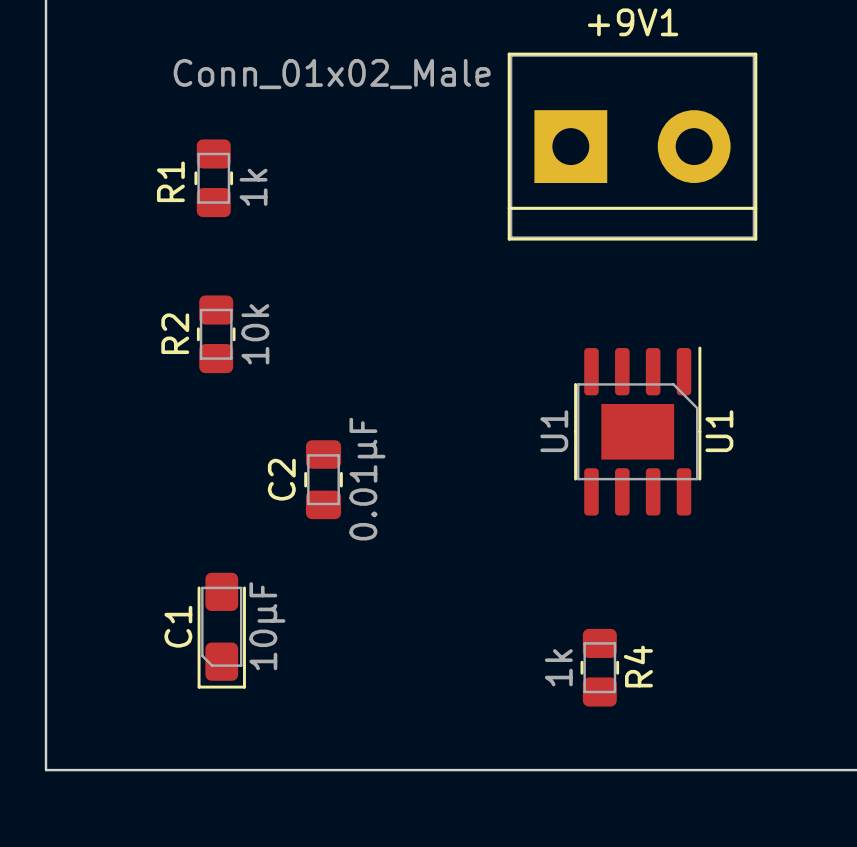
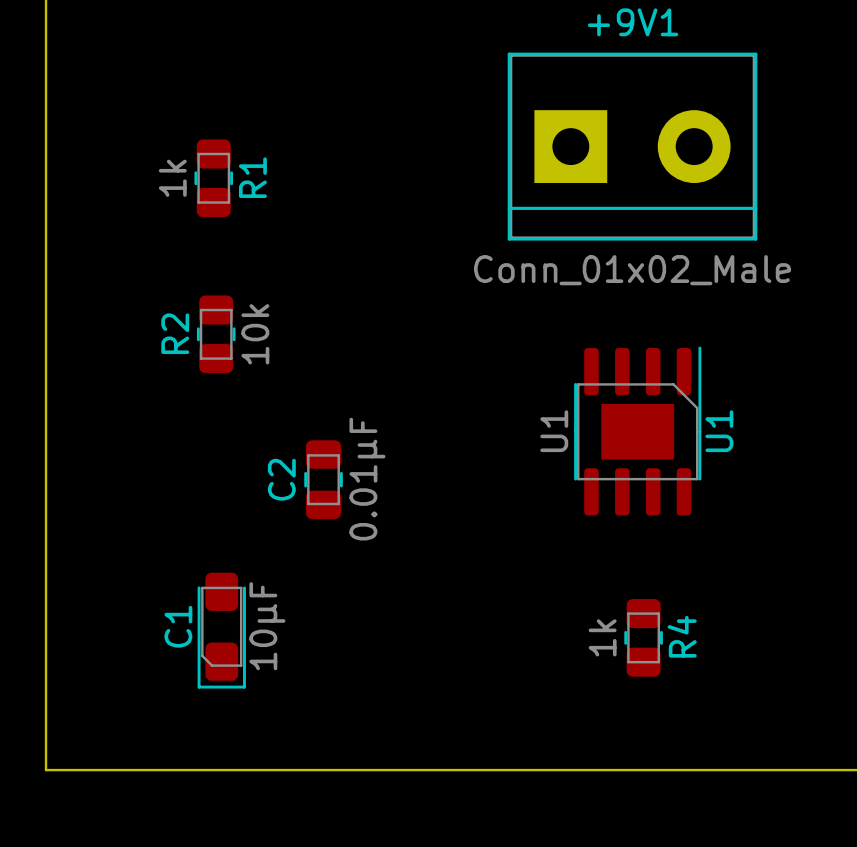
+9V1 value position: Conn_01x02_Male (332, 74) -> Conn_01x02_Male (632, 270)
R1 name position: R1 (170, 181) -> R1 (252, 177)
R1 value position: 1k (253, 187) -> 1k (172, 178)
R4 position: (599, 667) -> (643, 637)

